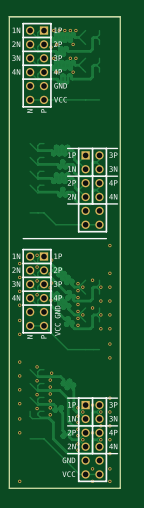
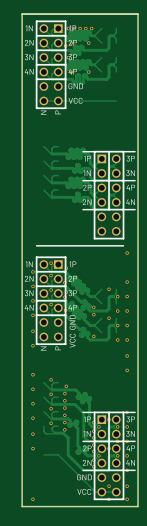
via: (70, 58) -> none
via: (75, 58) -> none
track: (30, 212) (44, 212) (55, 224) (99, 224) -> none
via: (77, 283) -> none
via: (82, 287) -> none
via: (77, 290) -> none
via: (77, 311) -> none
via: (82, 314) -> none
via: (77, 318) -> none
track: (30, 325) (44, 325) (67, 349) (99, 349) -> none

